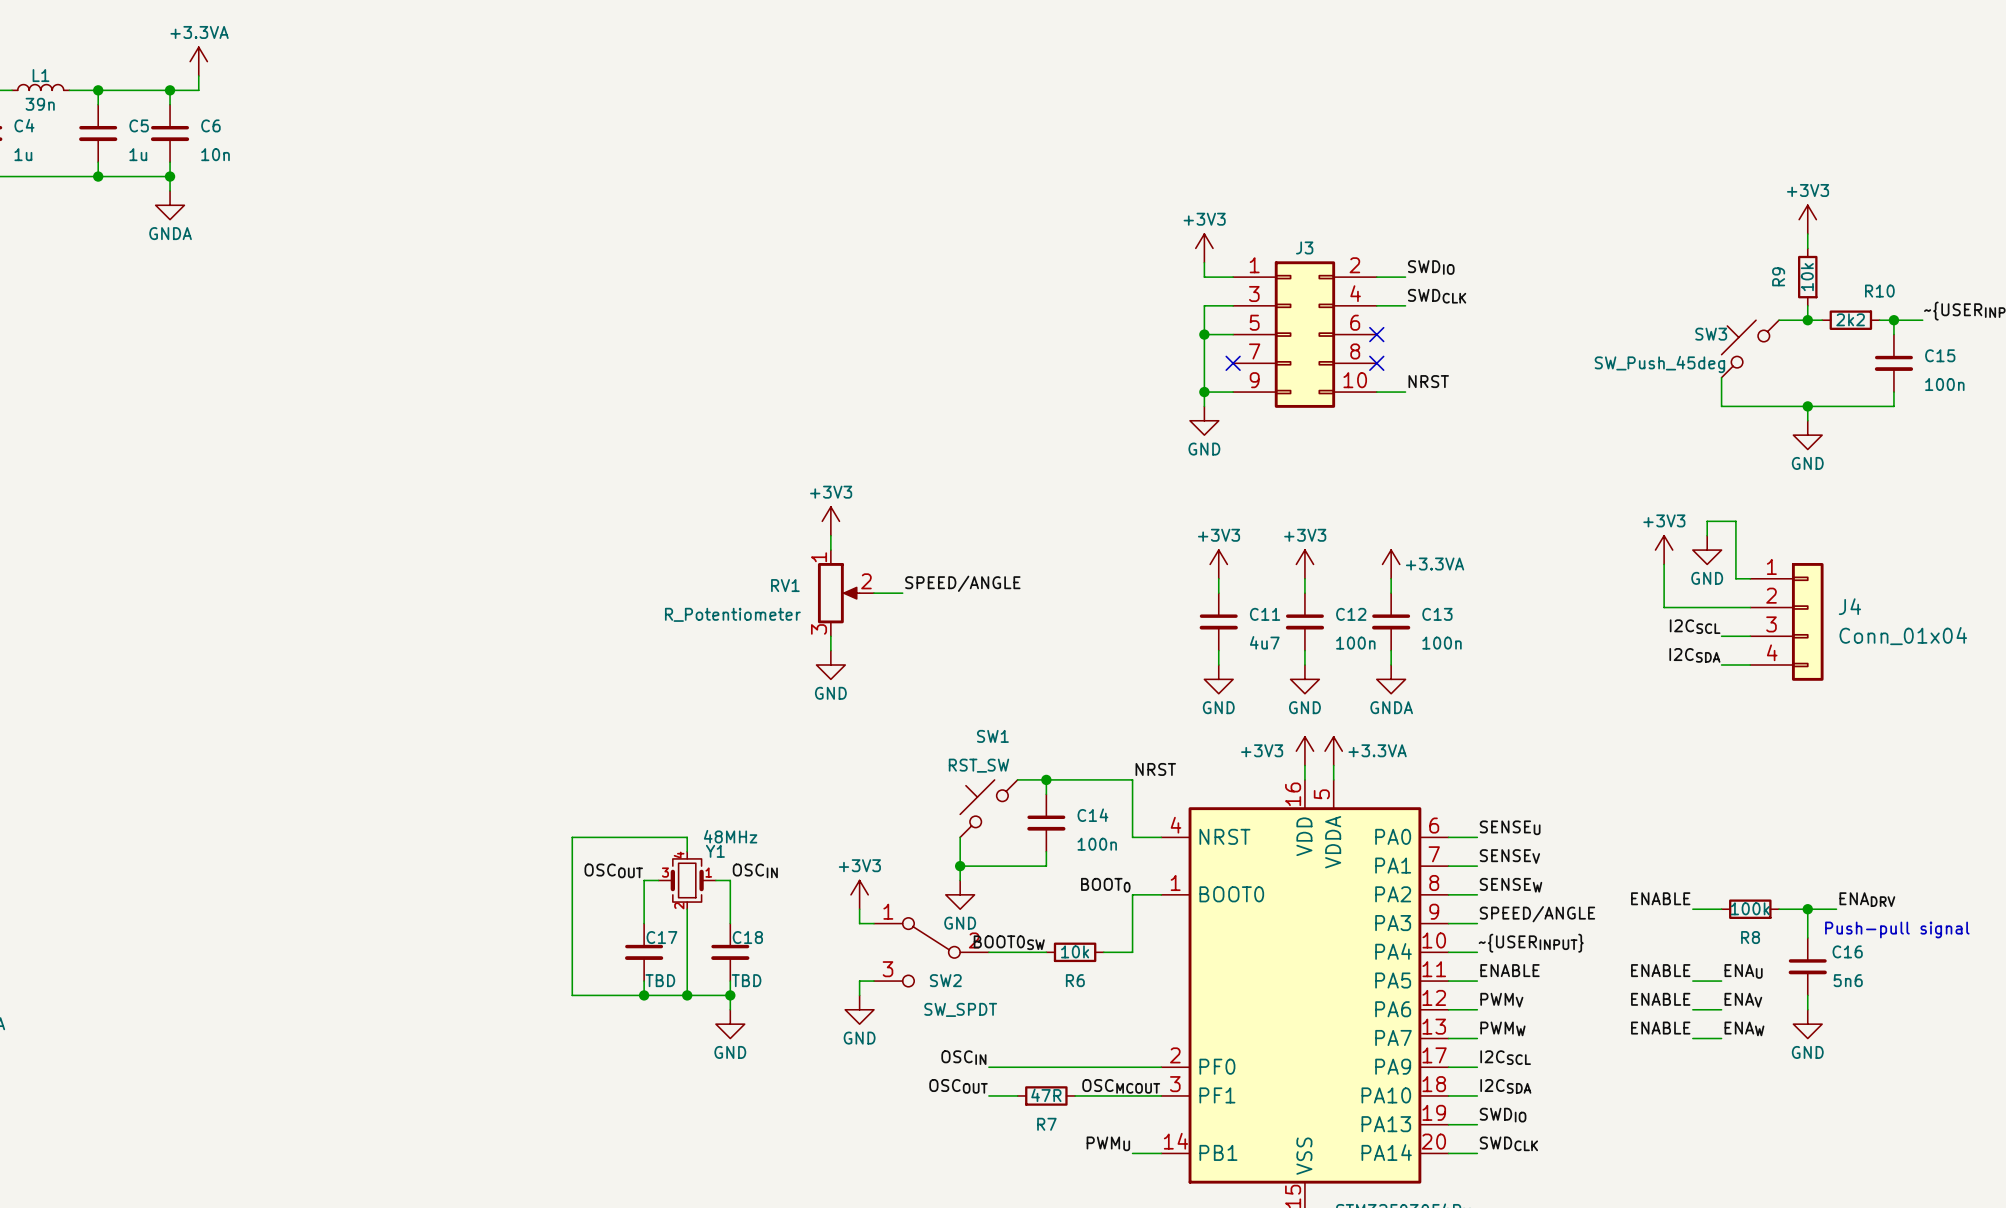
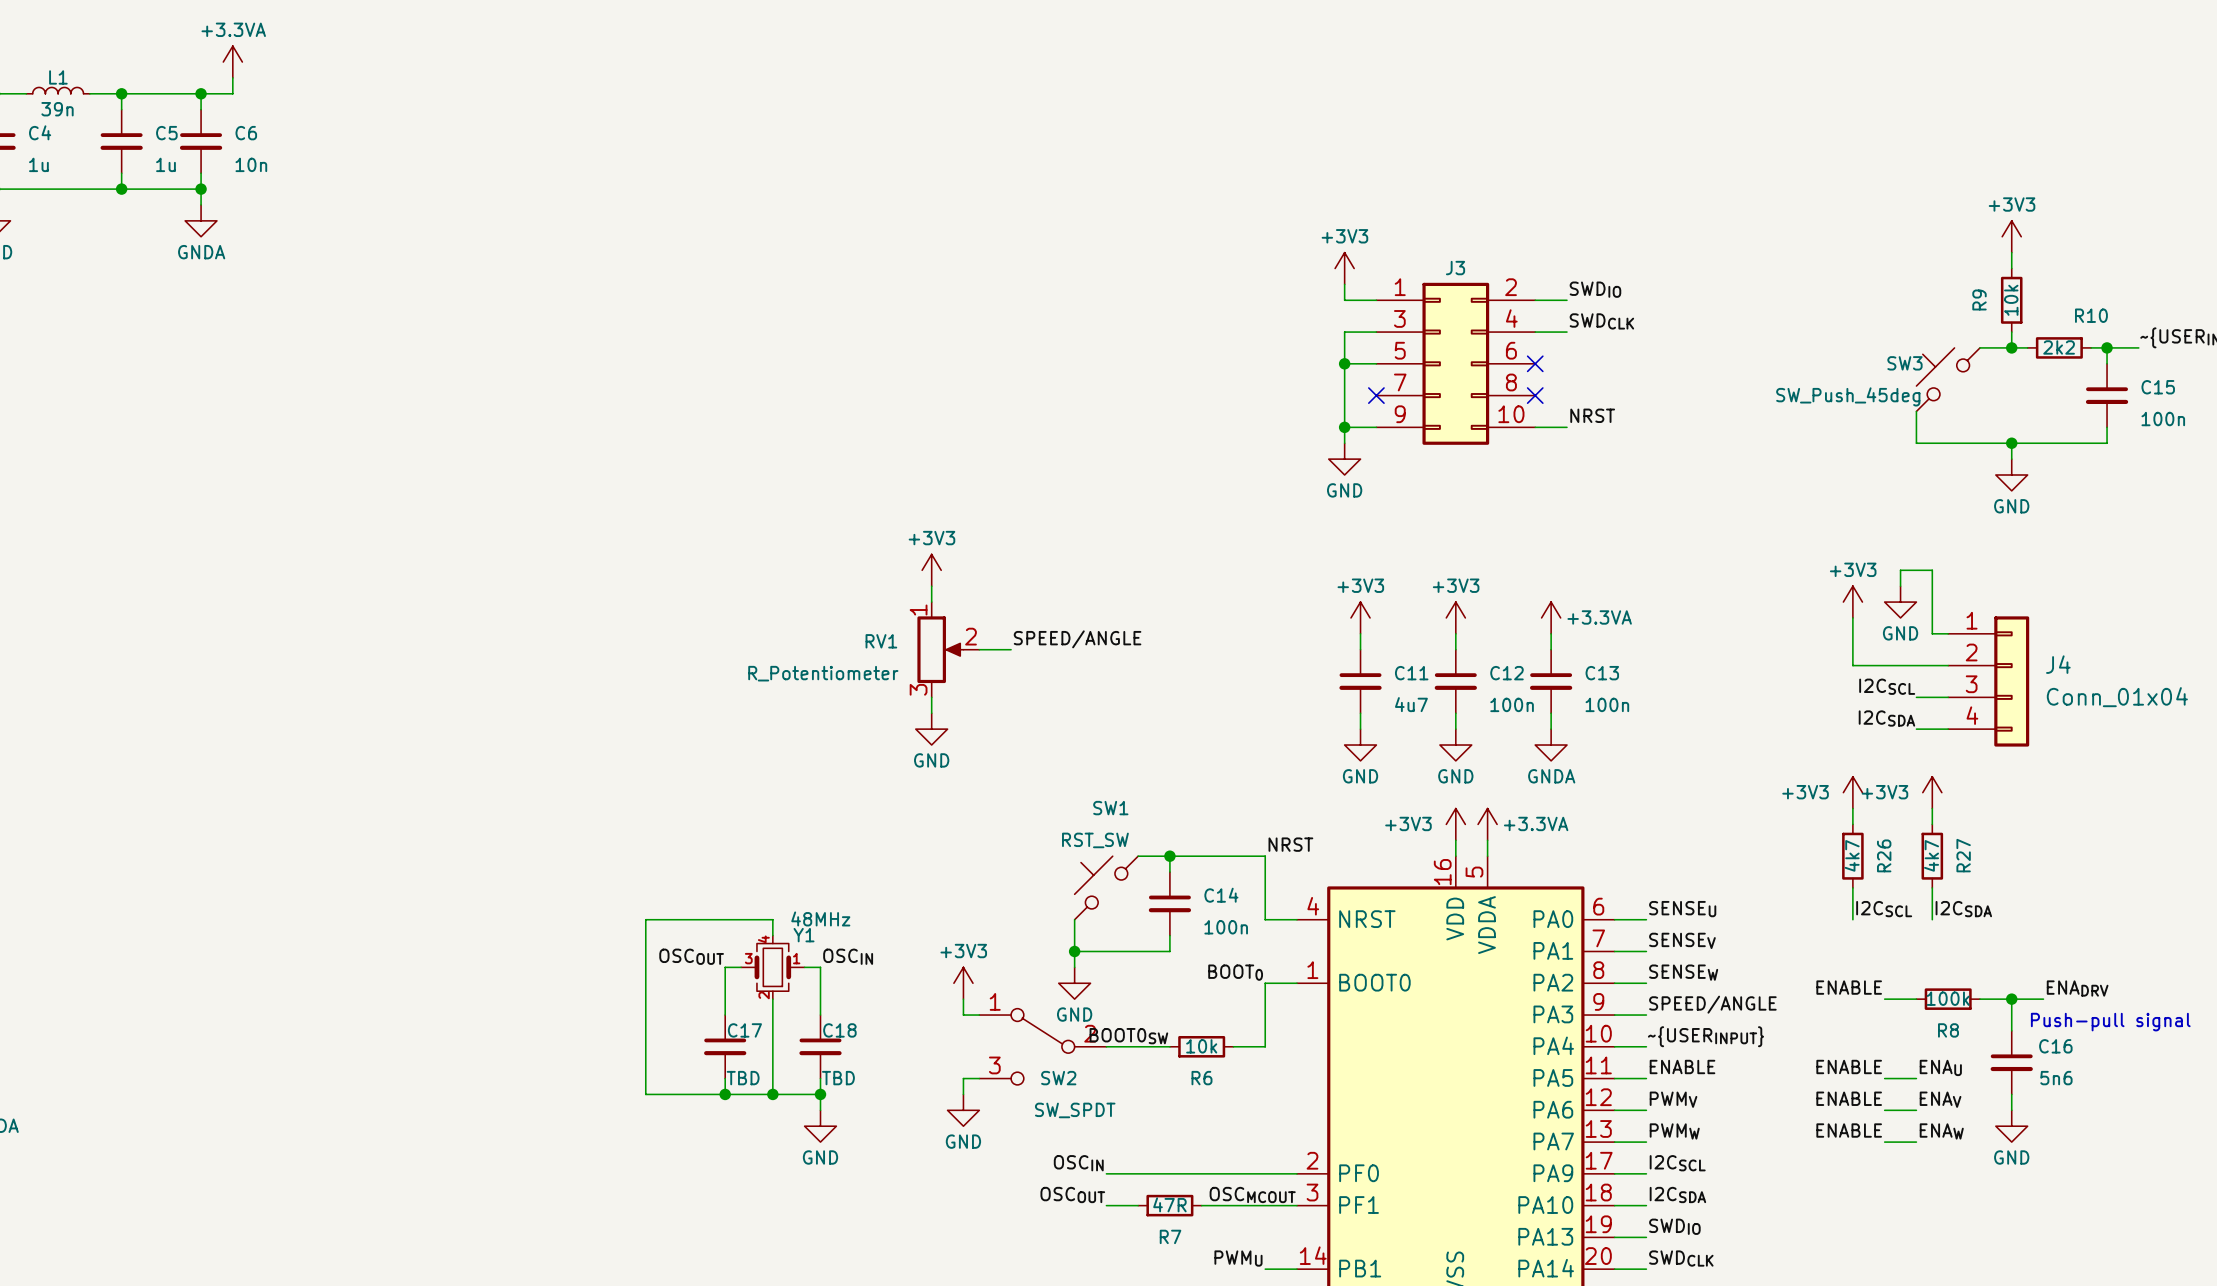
power symbol: none -> +3V3 (1852, 792)
power symbol: none -> +3V3 (1932, 792)
wire: none -> (1852, 808) (1852, 824)
wire: none -> (1932, 808) (1932, 824)
R26: none -> 4k7 (1852, 856)
R27: none -> 4k7 (1932, 856)
wire: none -> (1852, 887) (1852, 919)
wire: none -> (1932, 887) (1932, 919)
label: none -> I2CSCL (1884, 909)
label: none -> I2CSDA (1963, 909)

